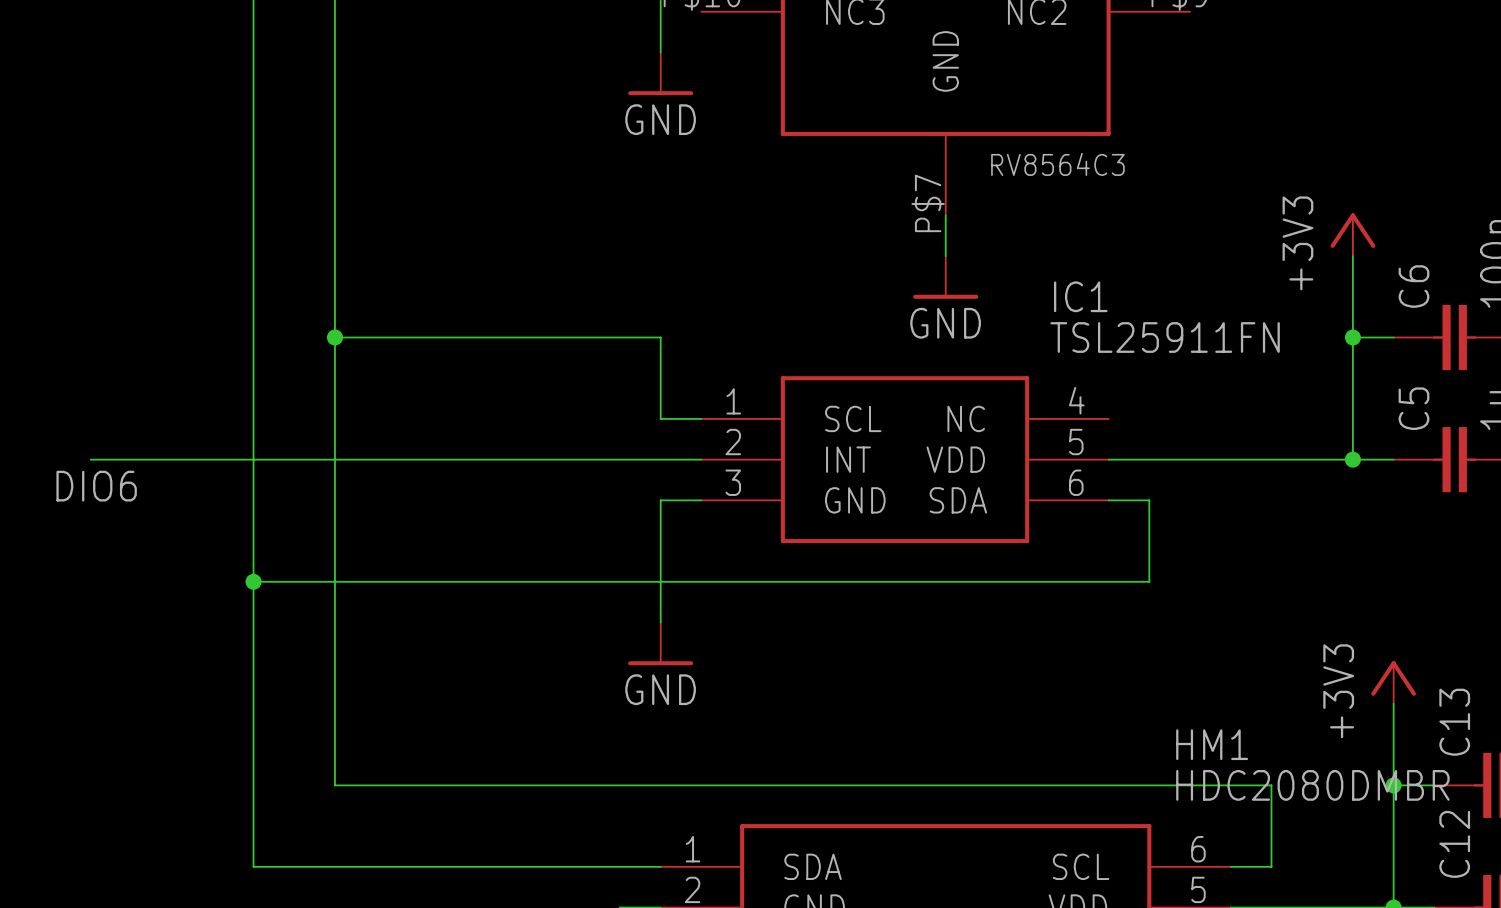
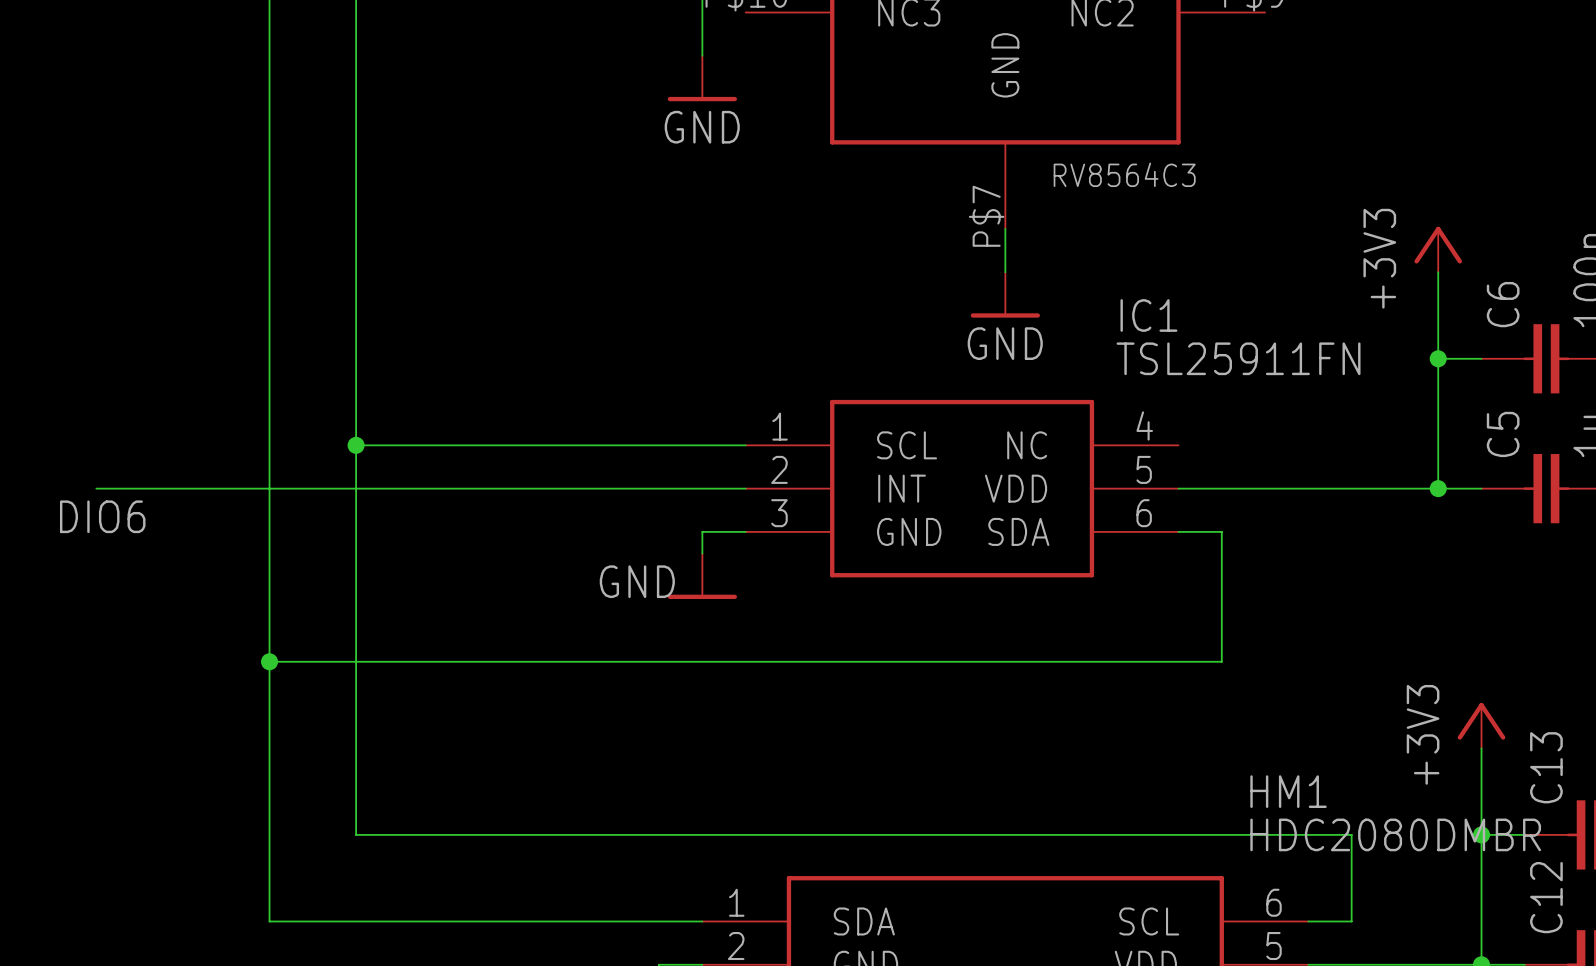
wire: (334, 337) (660, 337) (660, 418) -> (356, 445) (702, 445)
junction position: (334, 337) -> (356, 445)
wire: (660, 520) (660, 622) -> none
wire: (253, 581) (1149, 581) -> (269, 661) (1221, 661) (1221, 618)
junction position: (253, 581) -> (269, 661)
power symbol position: GND (660, 643) -> GND (702, 576)
power symbol text position: GND (660, 689) -> GND (637, 581)

